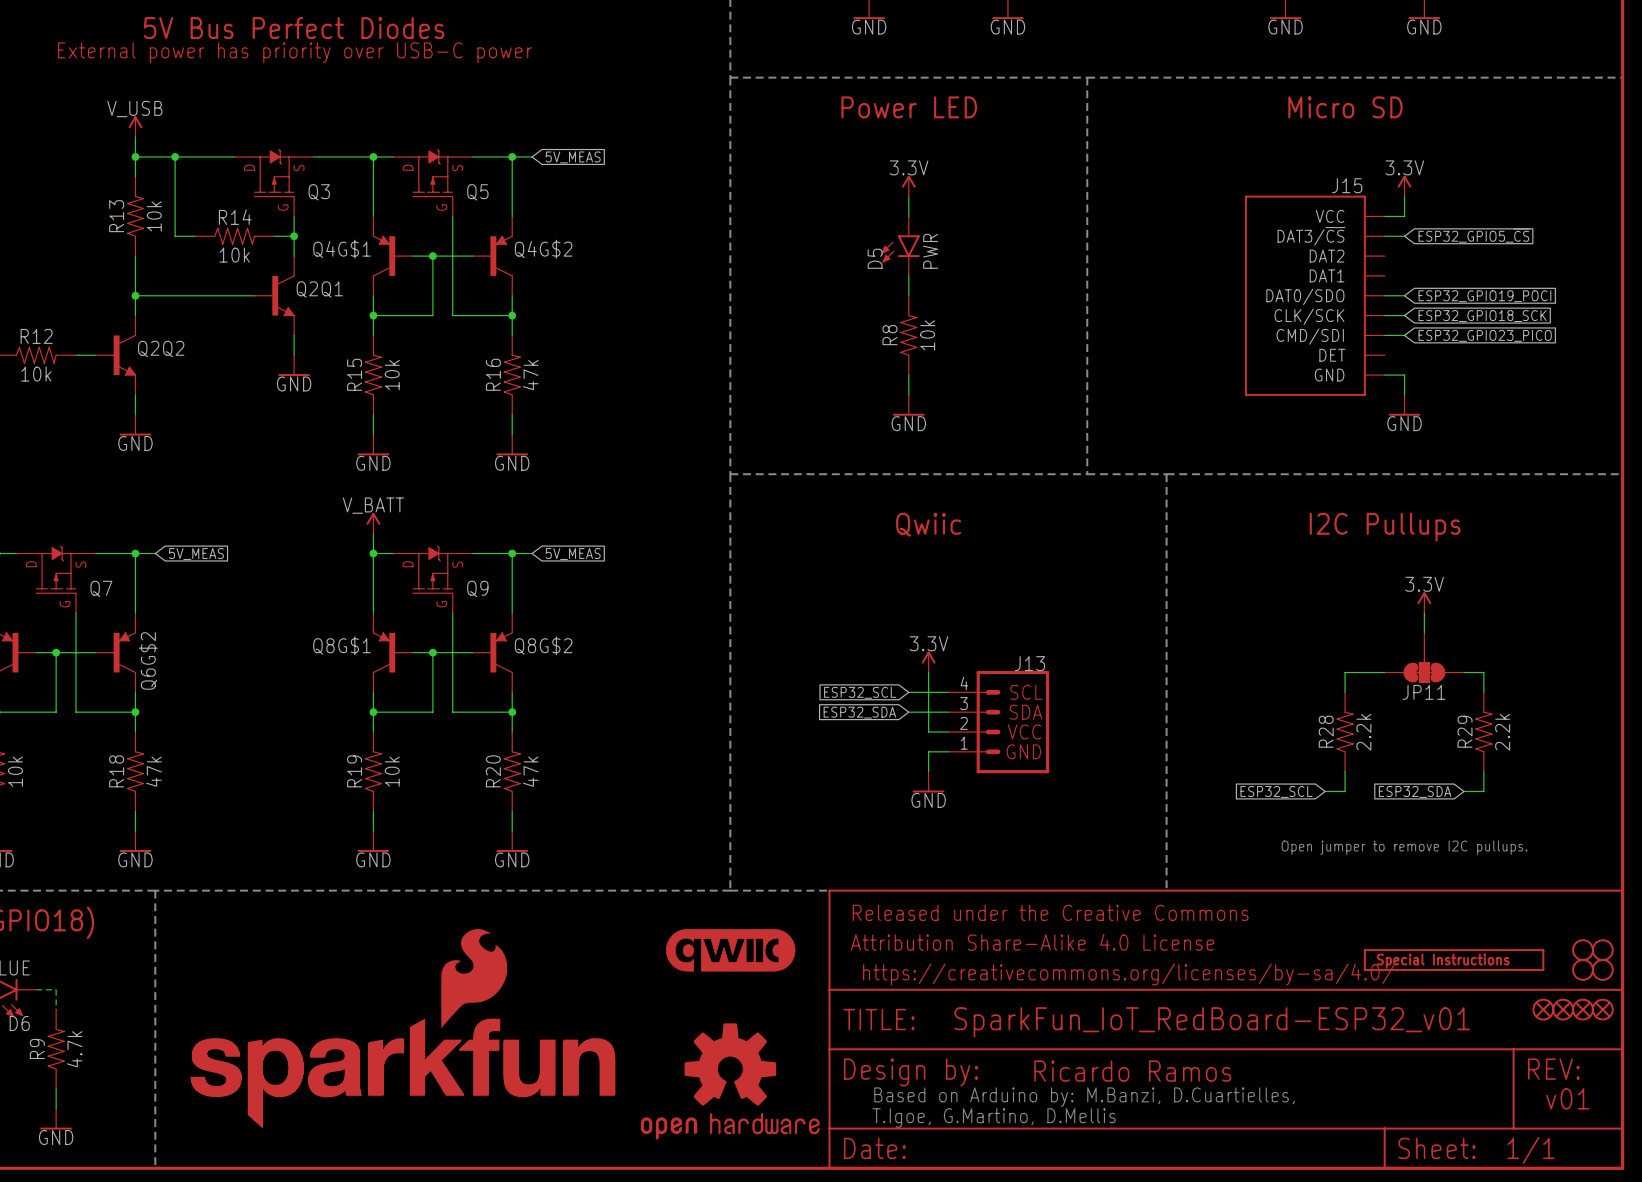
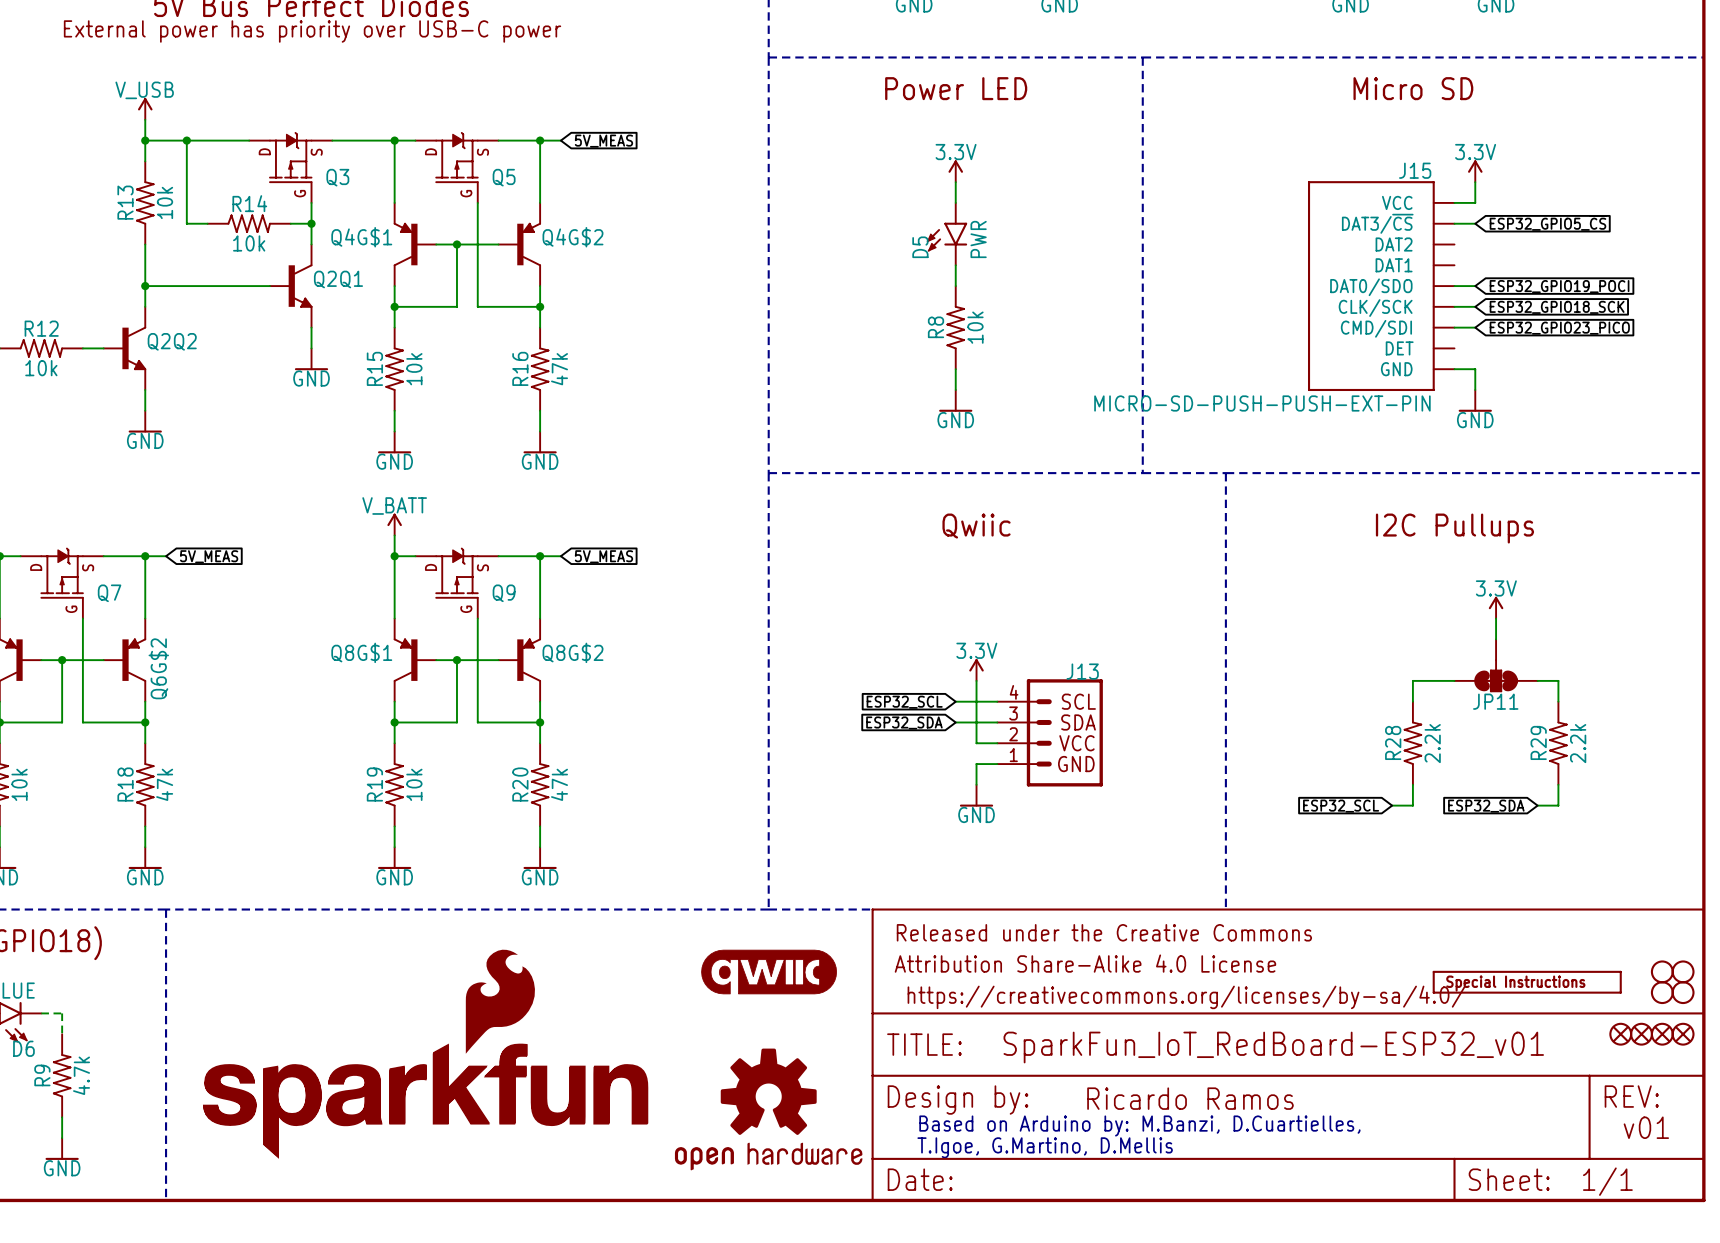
J15 value: none -> MICRO-SD-PUSH-PUSH-EXT-PIN (1262, 403)
text: Open jumper to remove I2C pullups. (1404, 847) -> none

